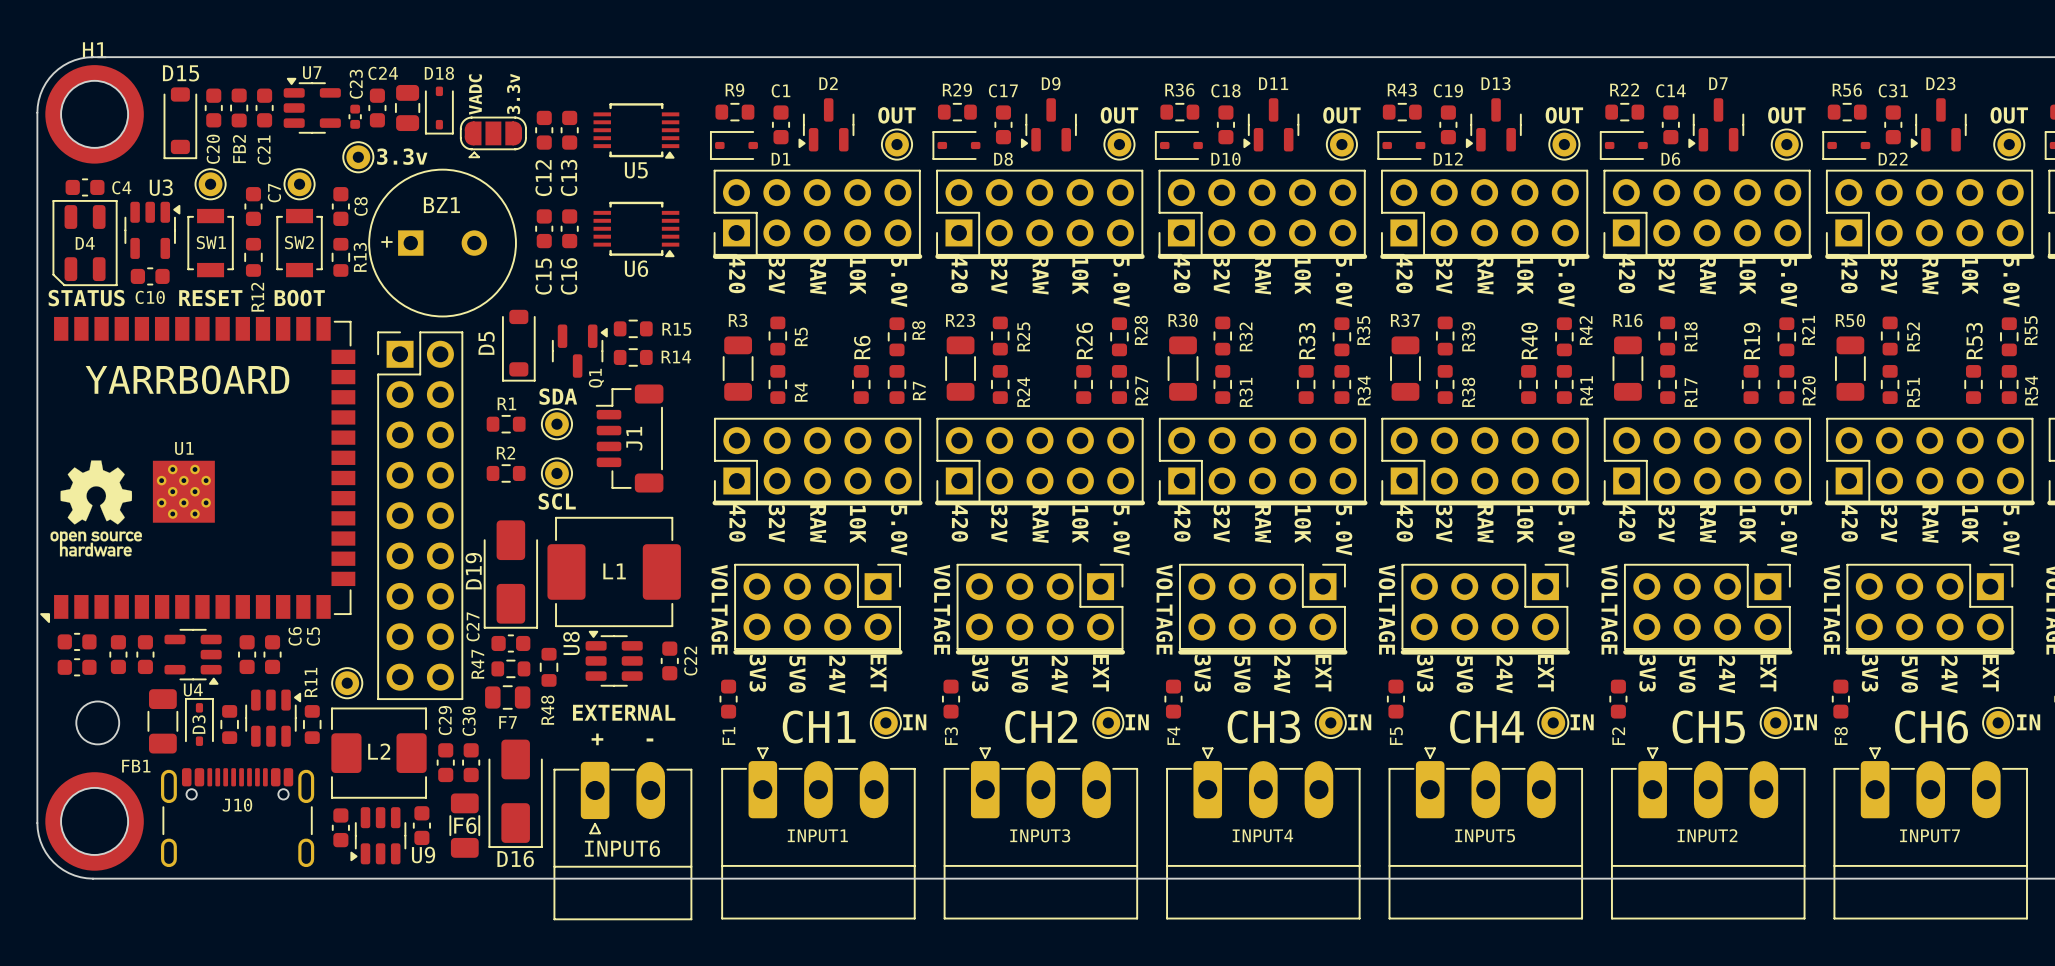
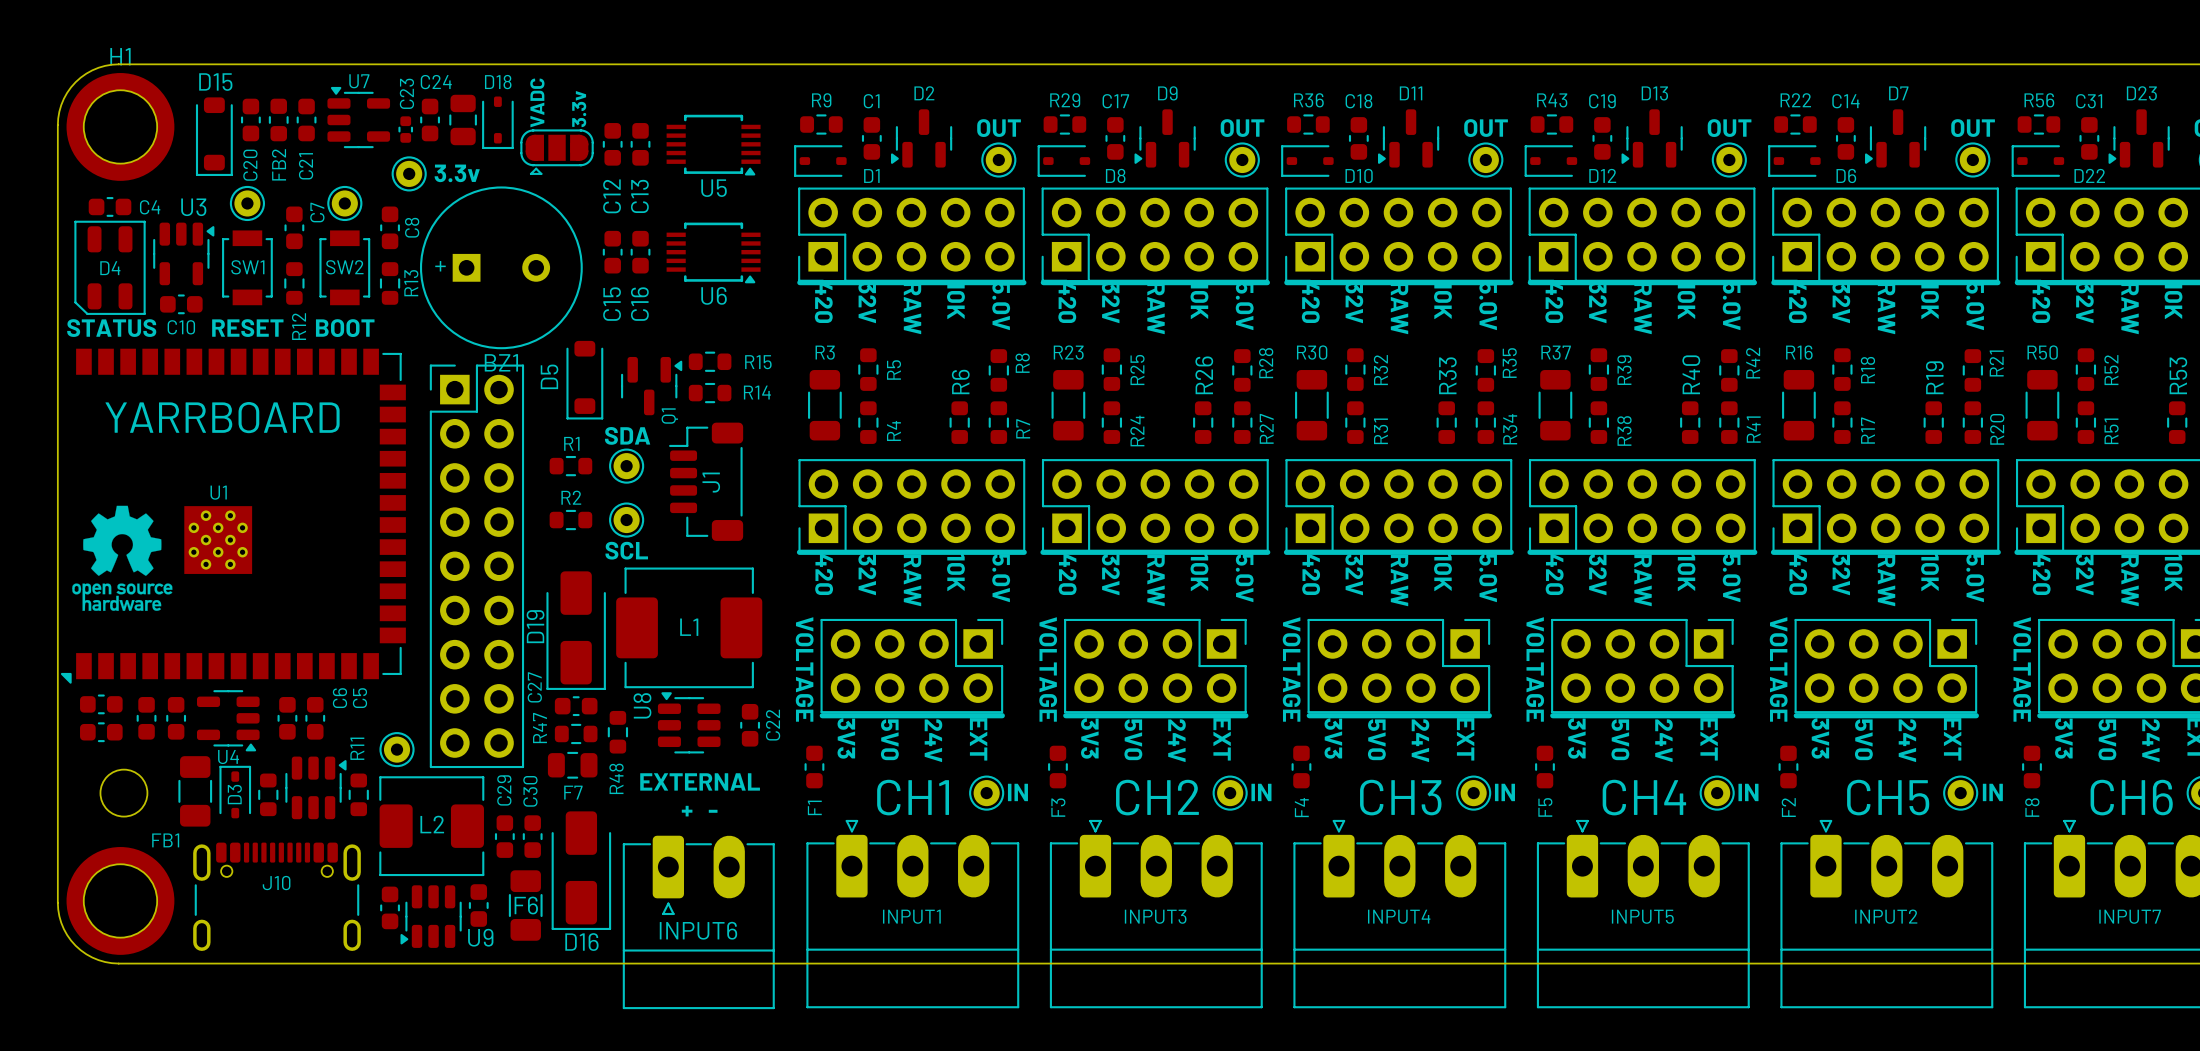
BZ1 name position: BZ1 (441, 205) -> BZ1 (501, 362)

